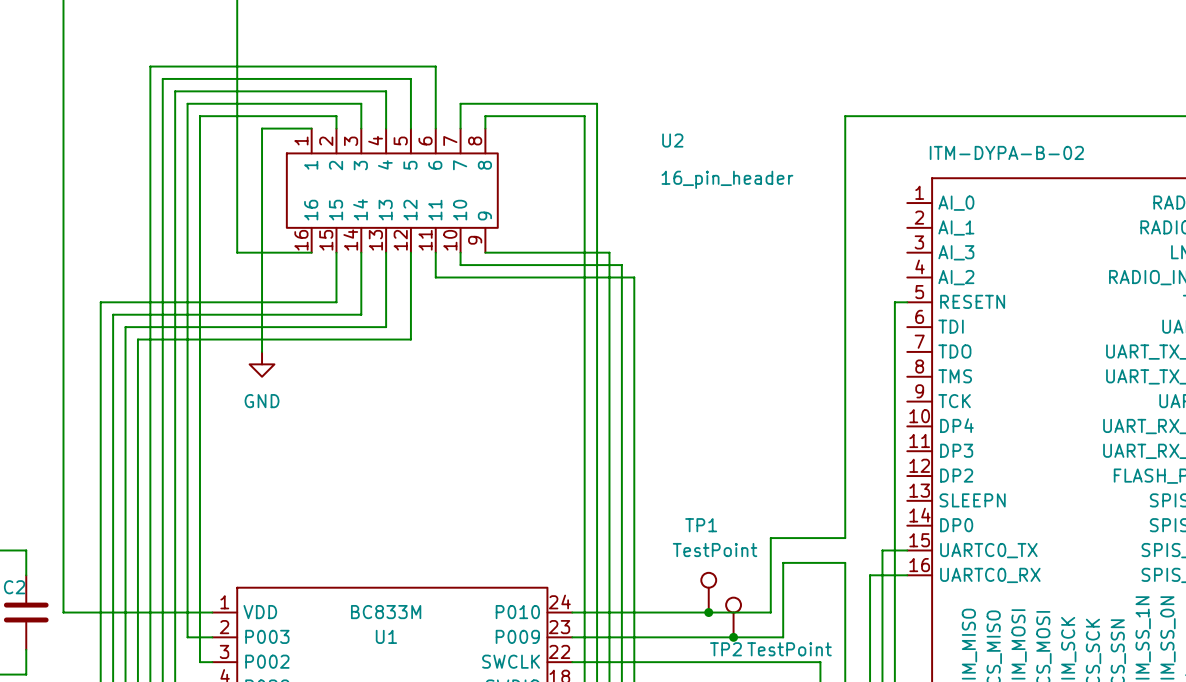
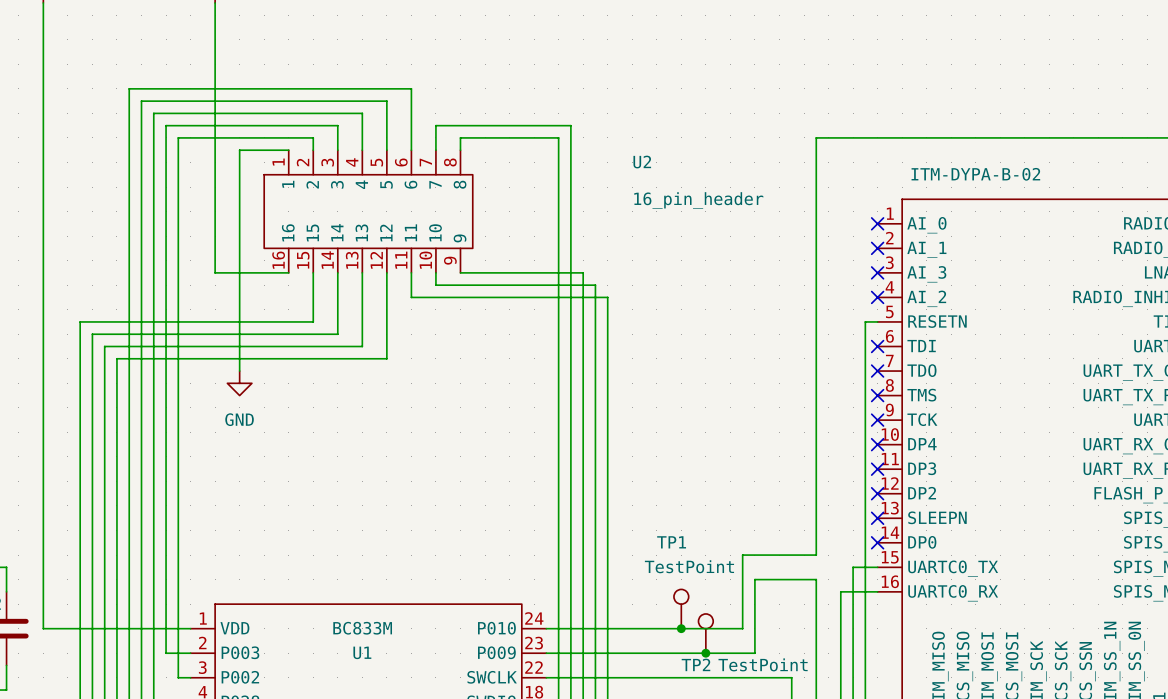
no-connect mark: none -> (877, 223)
no-connect mark: none -> (877, 248)
no-connect mark: none -> (877, 272)
no-connect mark: none -> (877, 297)
no-connect mark: none -> (877, 346)
no-connect mark: none -> (877, 371)
no-connect mark: none -> (877, 395)
no-connect mark: none -> (877, 420)
no-connect mark: none -> (877, 444)
no-connect mark: none -> (877, 469)
no-connect mark: none -> (877, 493)
no-connect mark: none -> (877, 518)
no-connect mark: none -> (877, 542)

